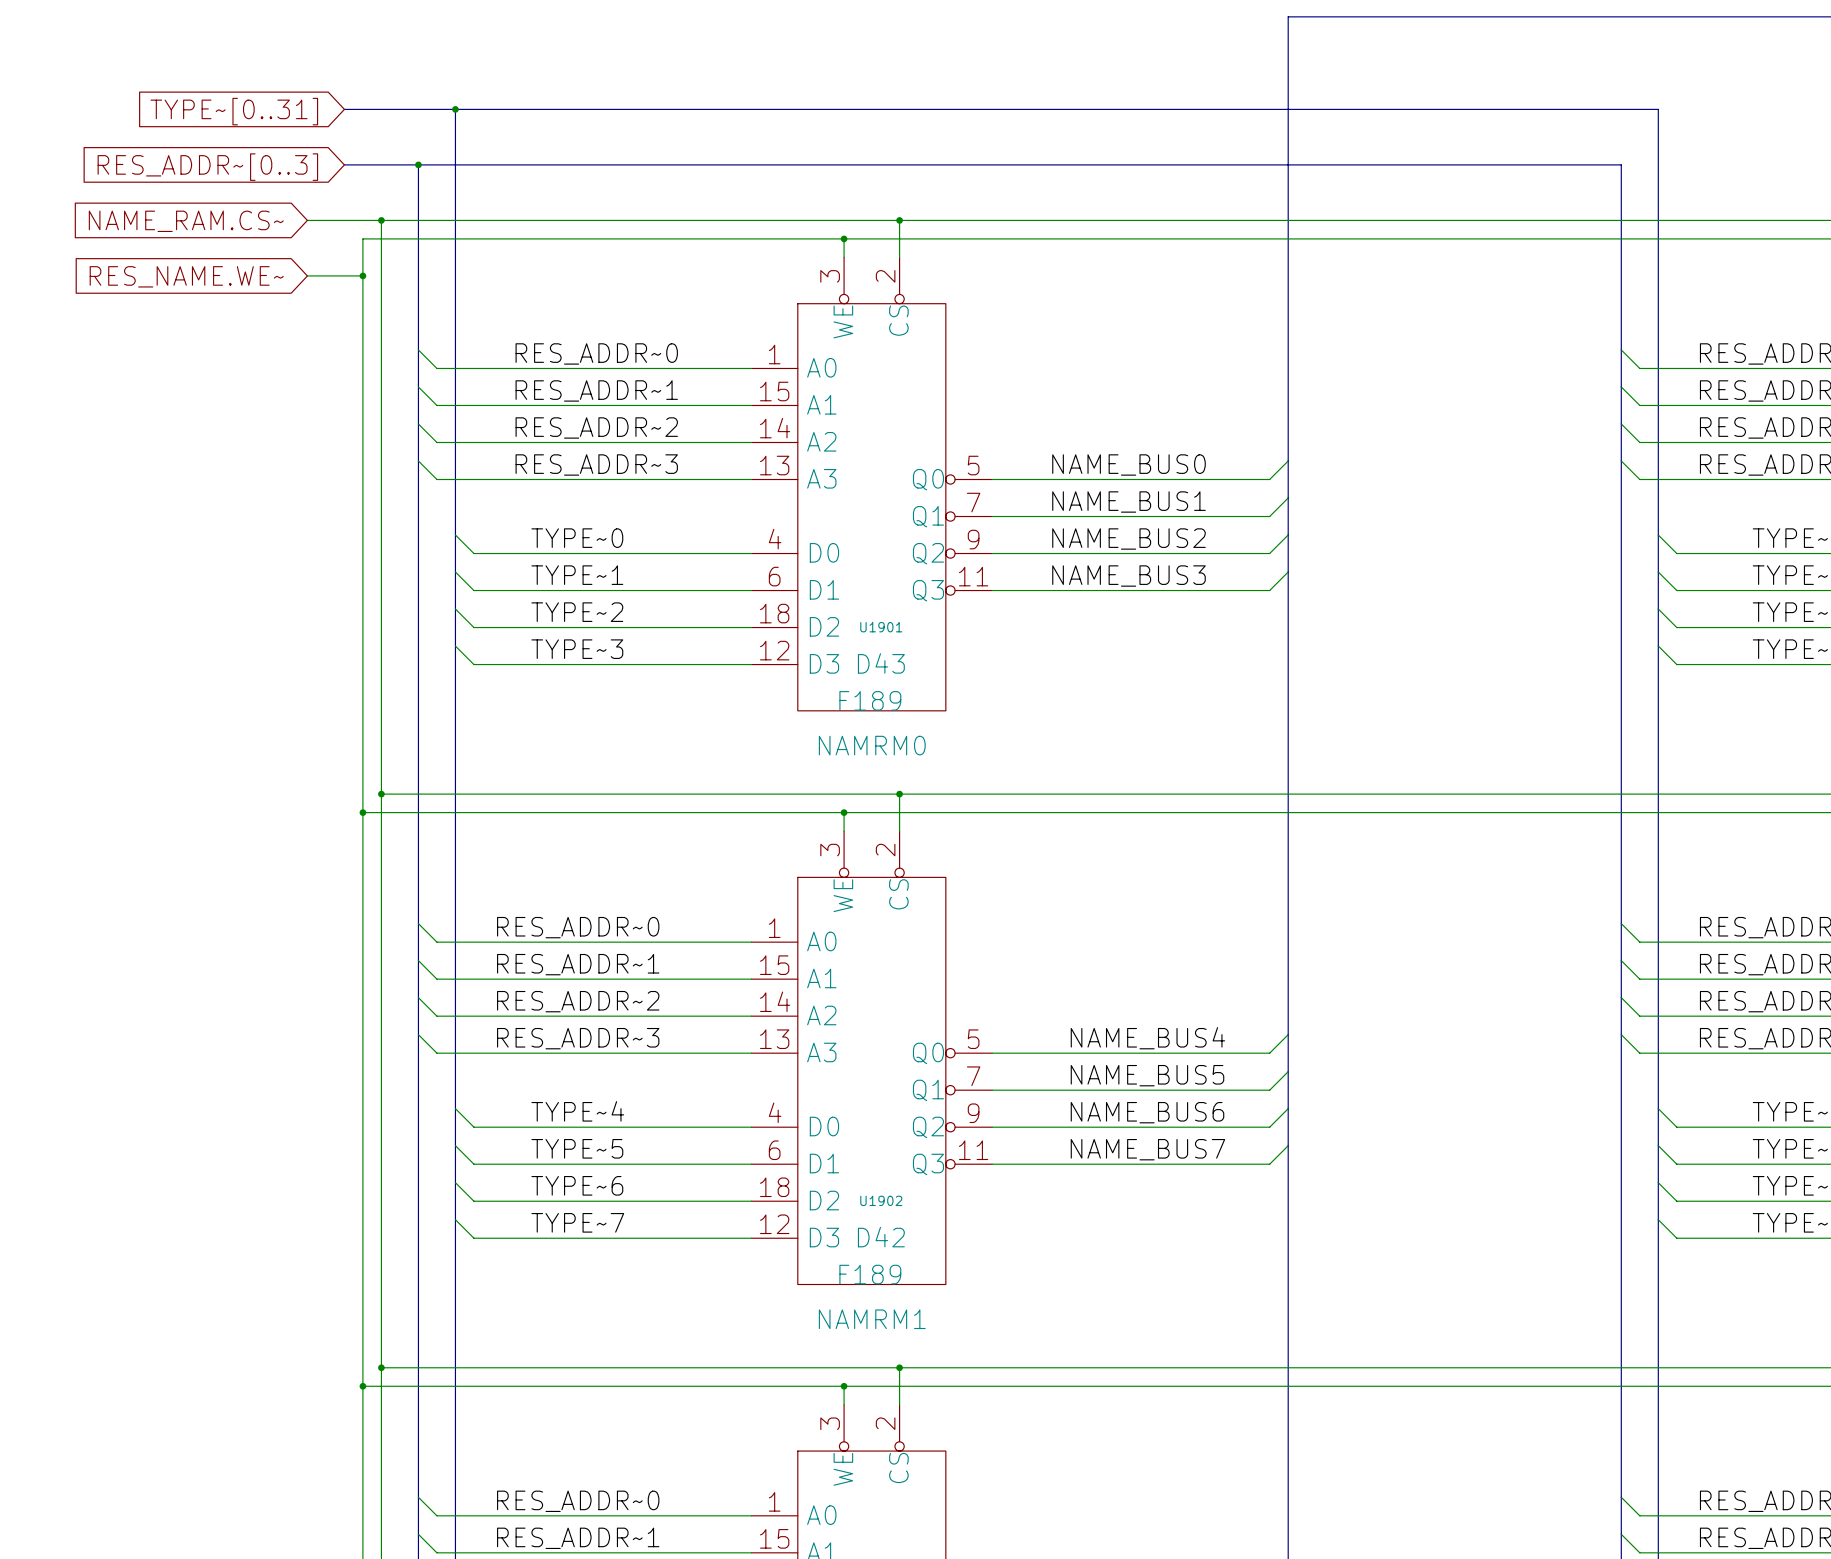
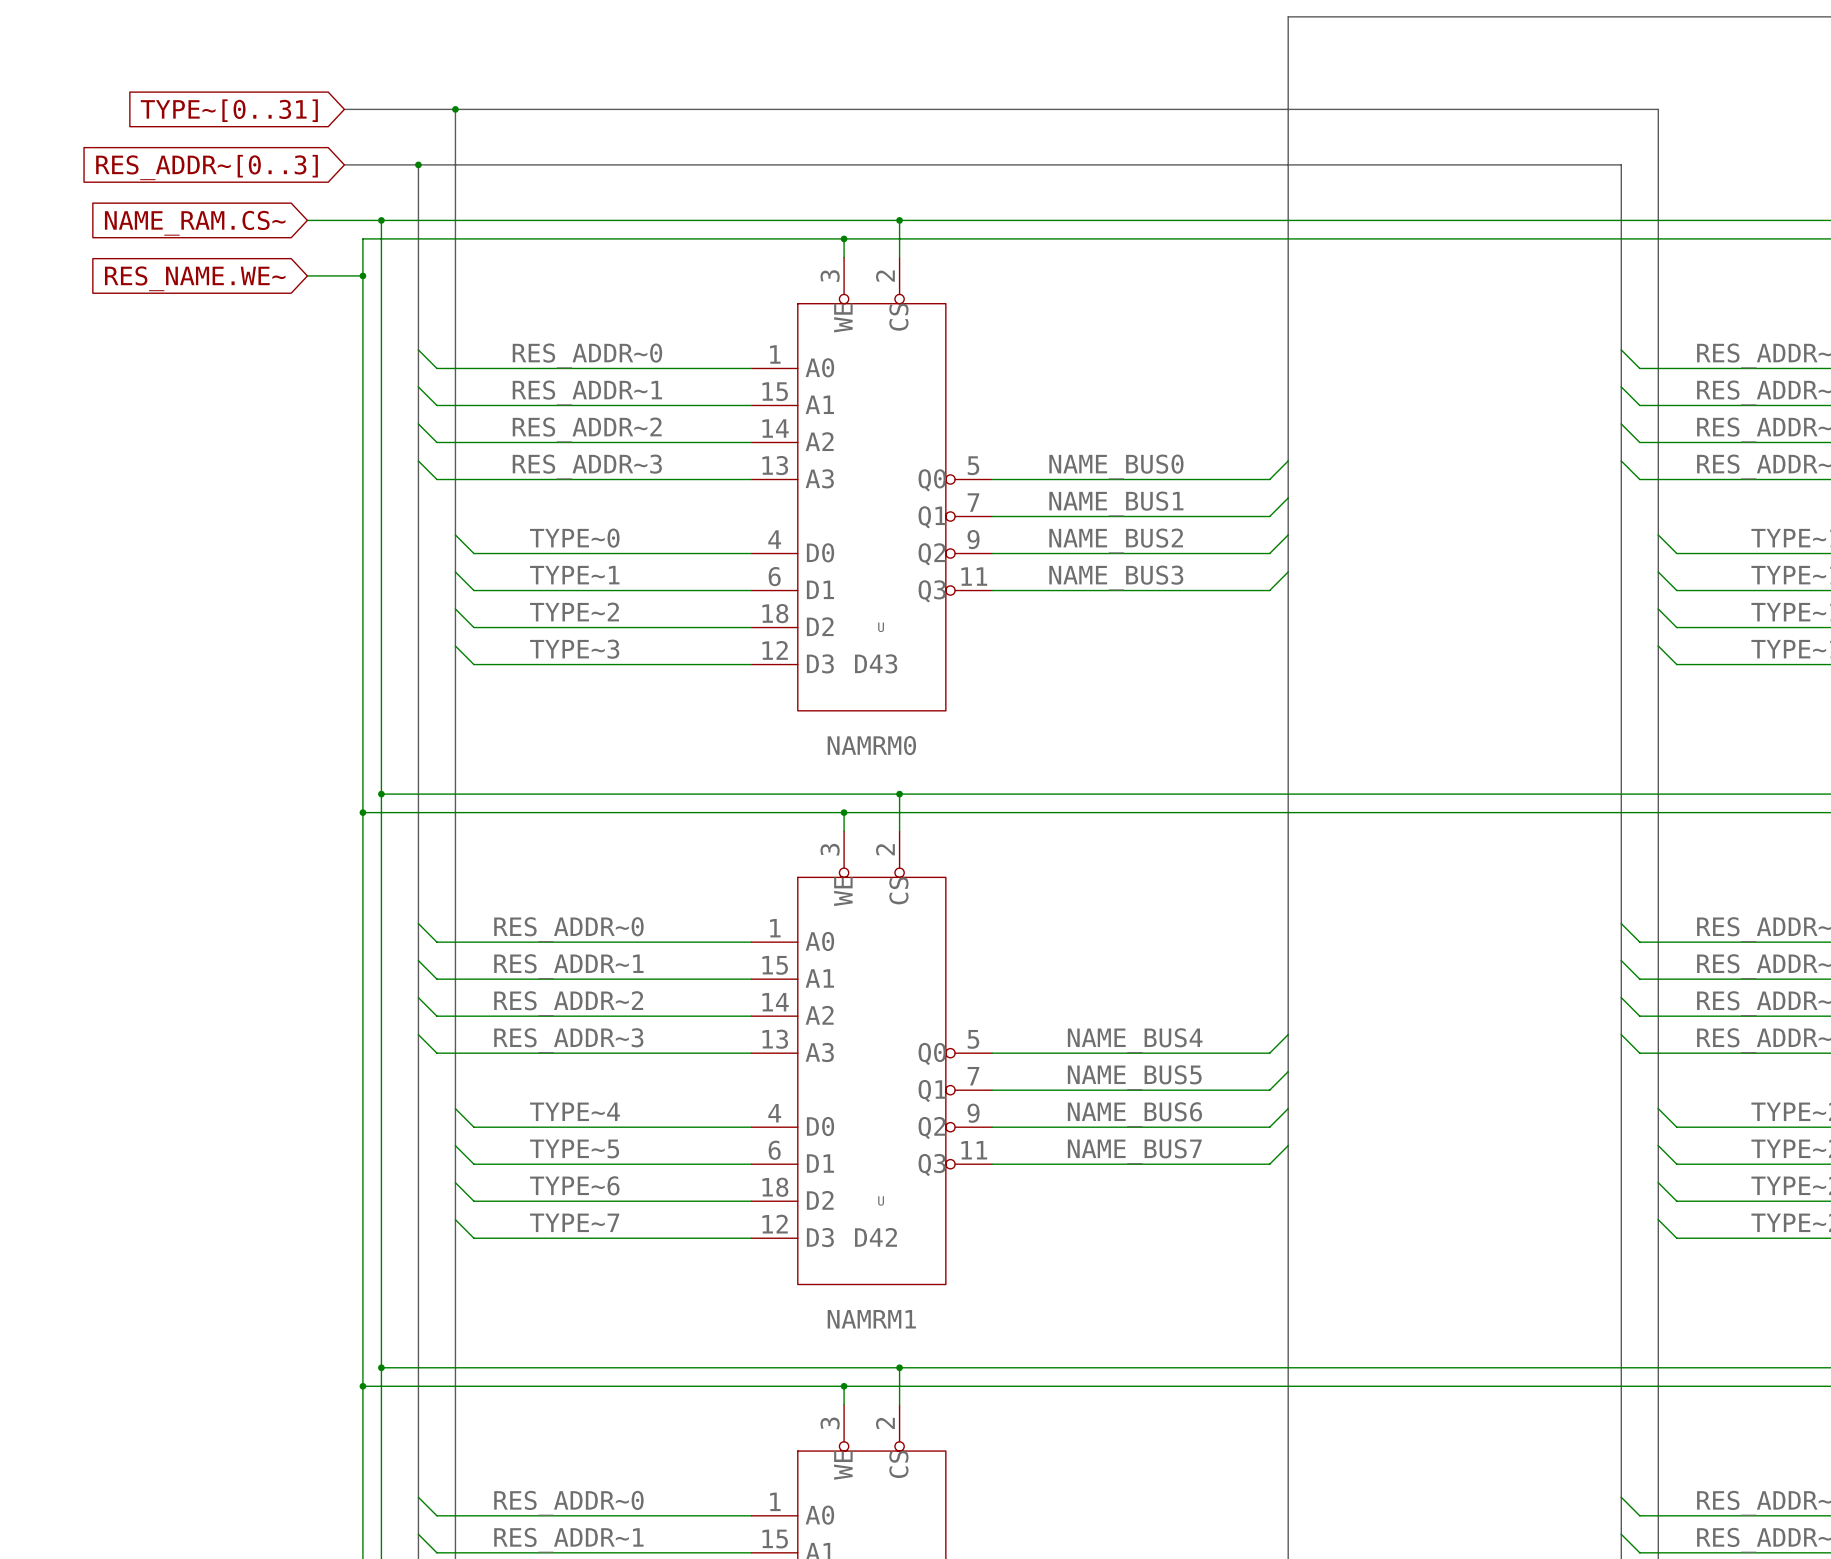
U1901 name: U1901 (881, 627) -> U (881, 627)
U1901 value: F189 (870, 700) -> none
U1902 name: U1902 (881, 1200) -> U (881, 1200)
U1902 value: F189 (870, 1274) -> none

